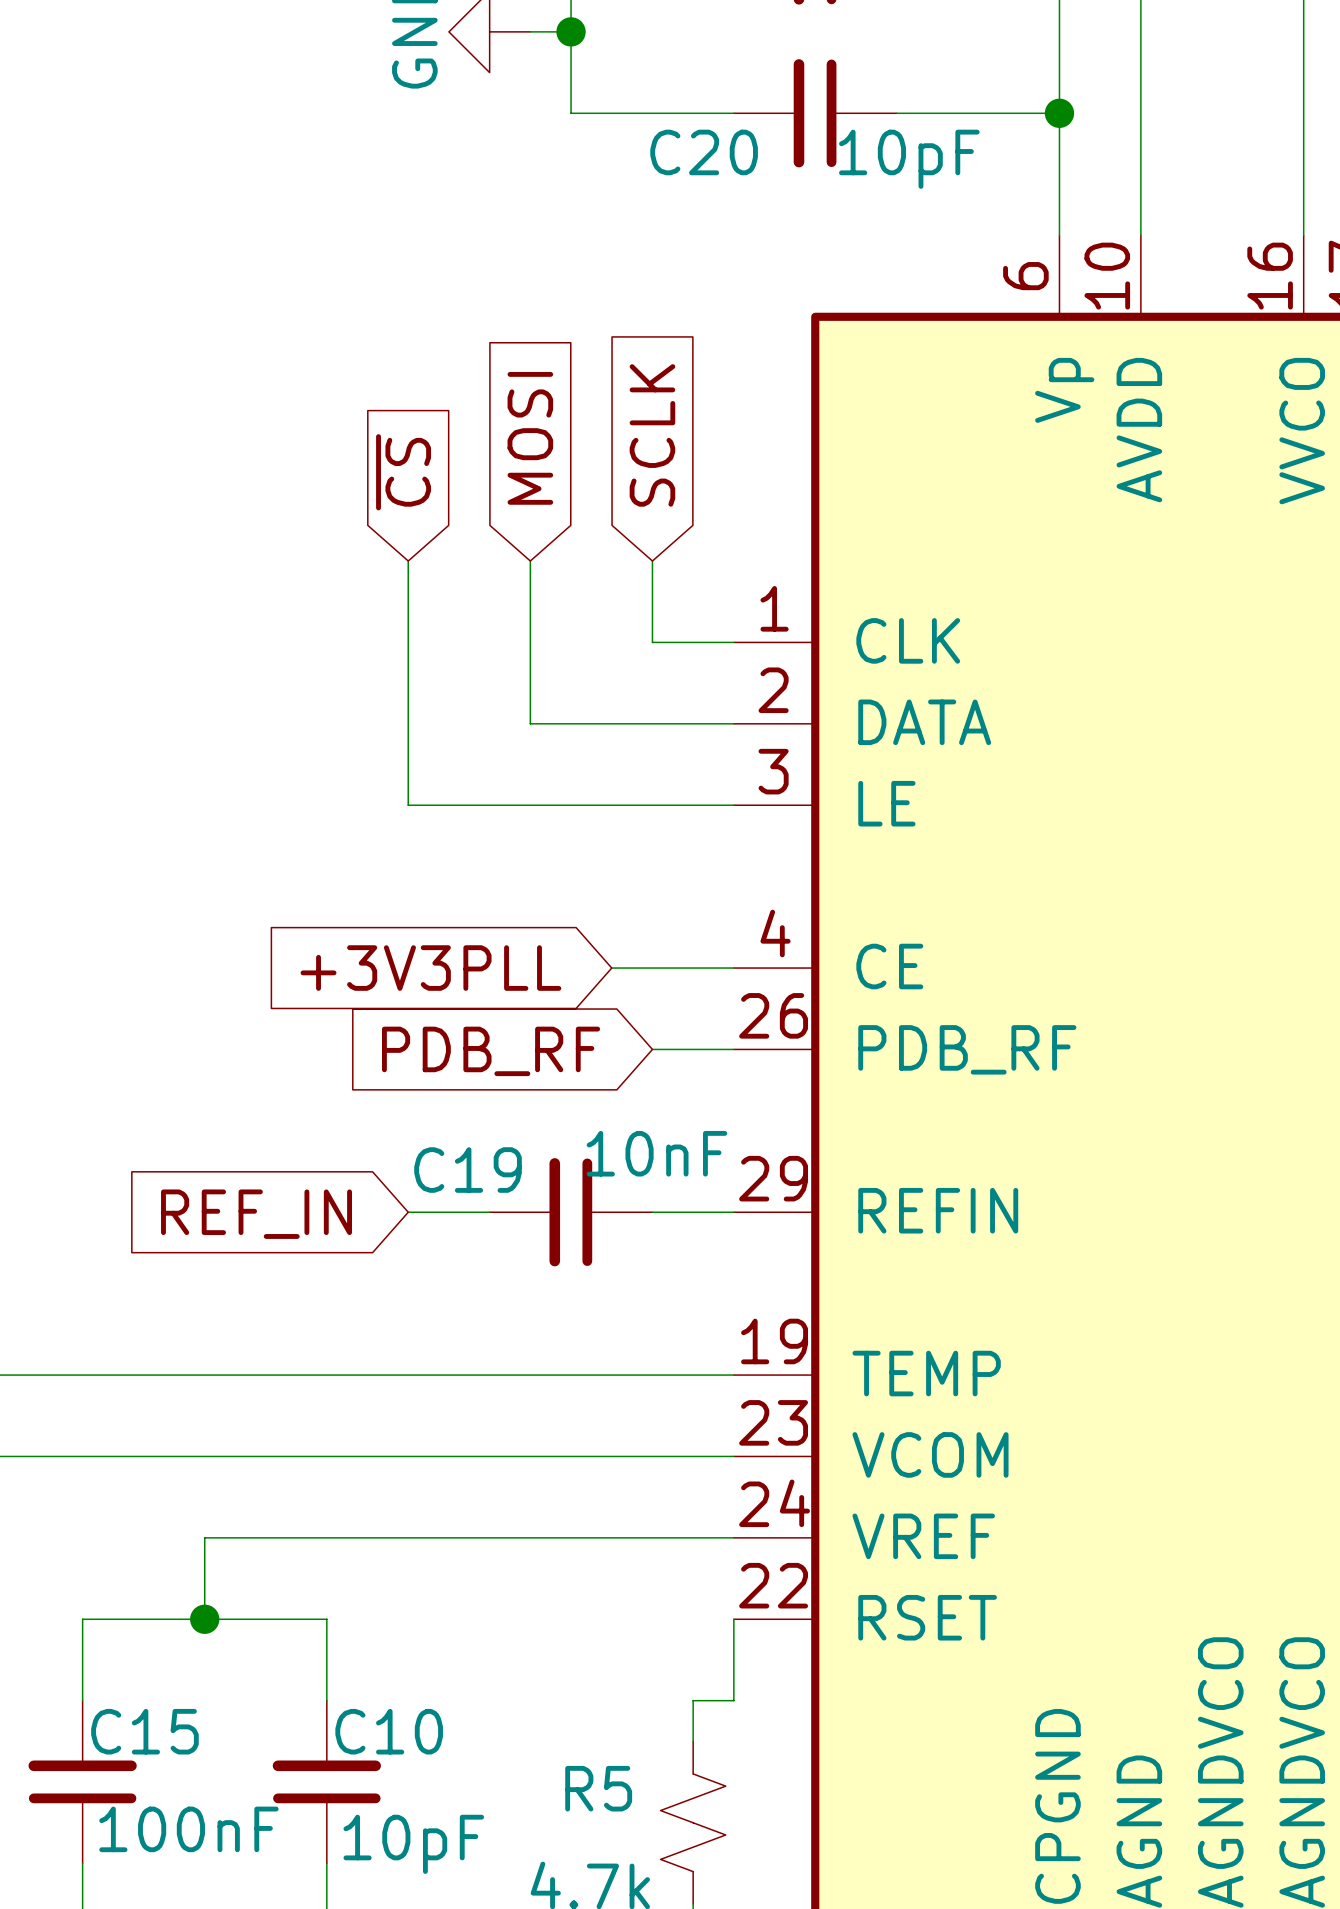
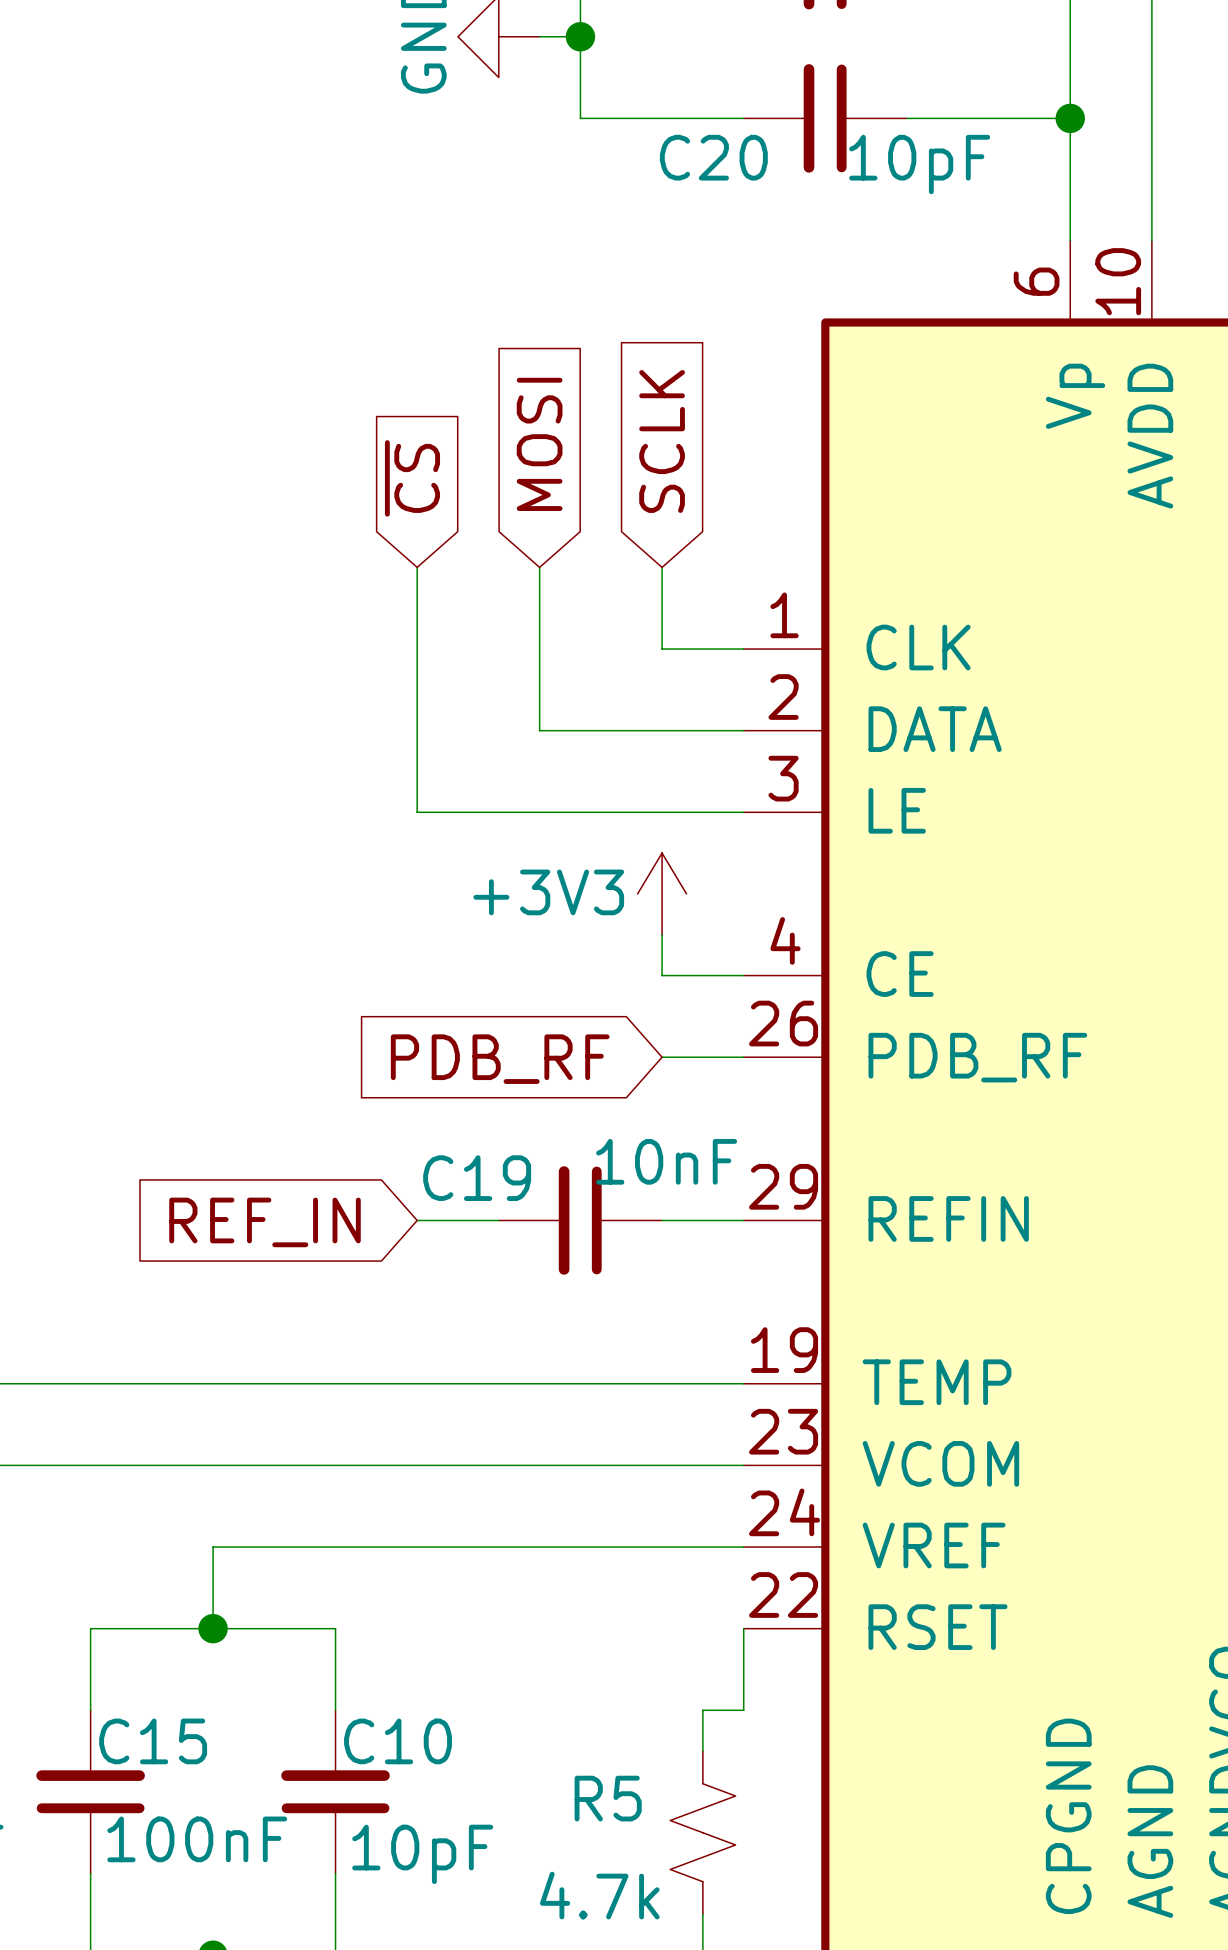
power symbol: none -> +3V3 (662, 893)
global label: +3V3PLL (430, 968) -> none
wire: (611, 968) (652, 968) -> (662, 934) (662, 975)

